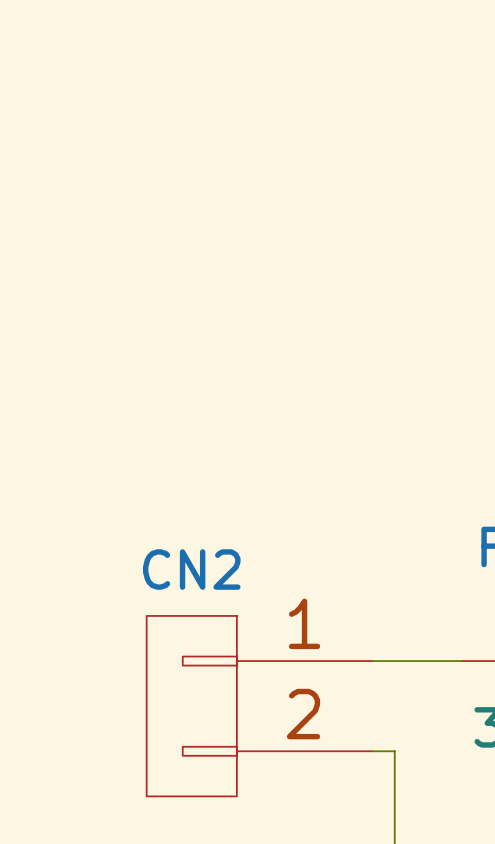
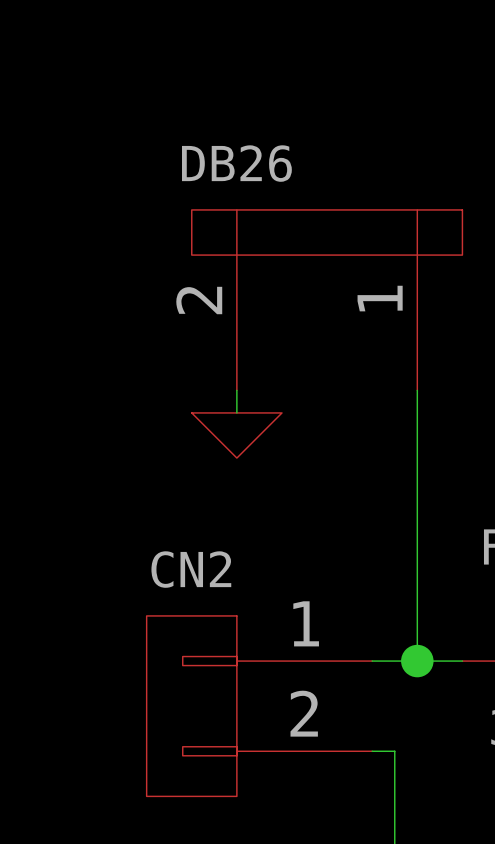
DB26: none -> (327, 300)
wire: none -> (236, 390) (236, 412)
wire: none -> (417, 390) (417, 661)
power symbol: none -> (236, 435)
junction: none -> (417, 661)

